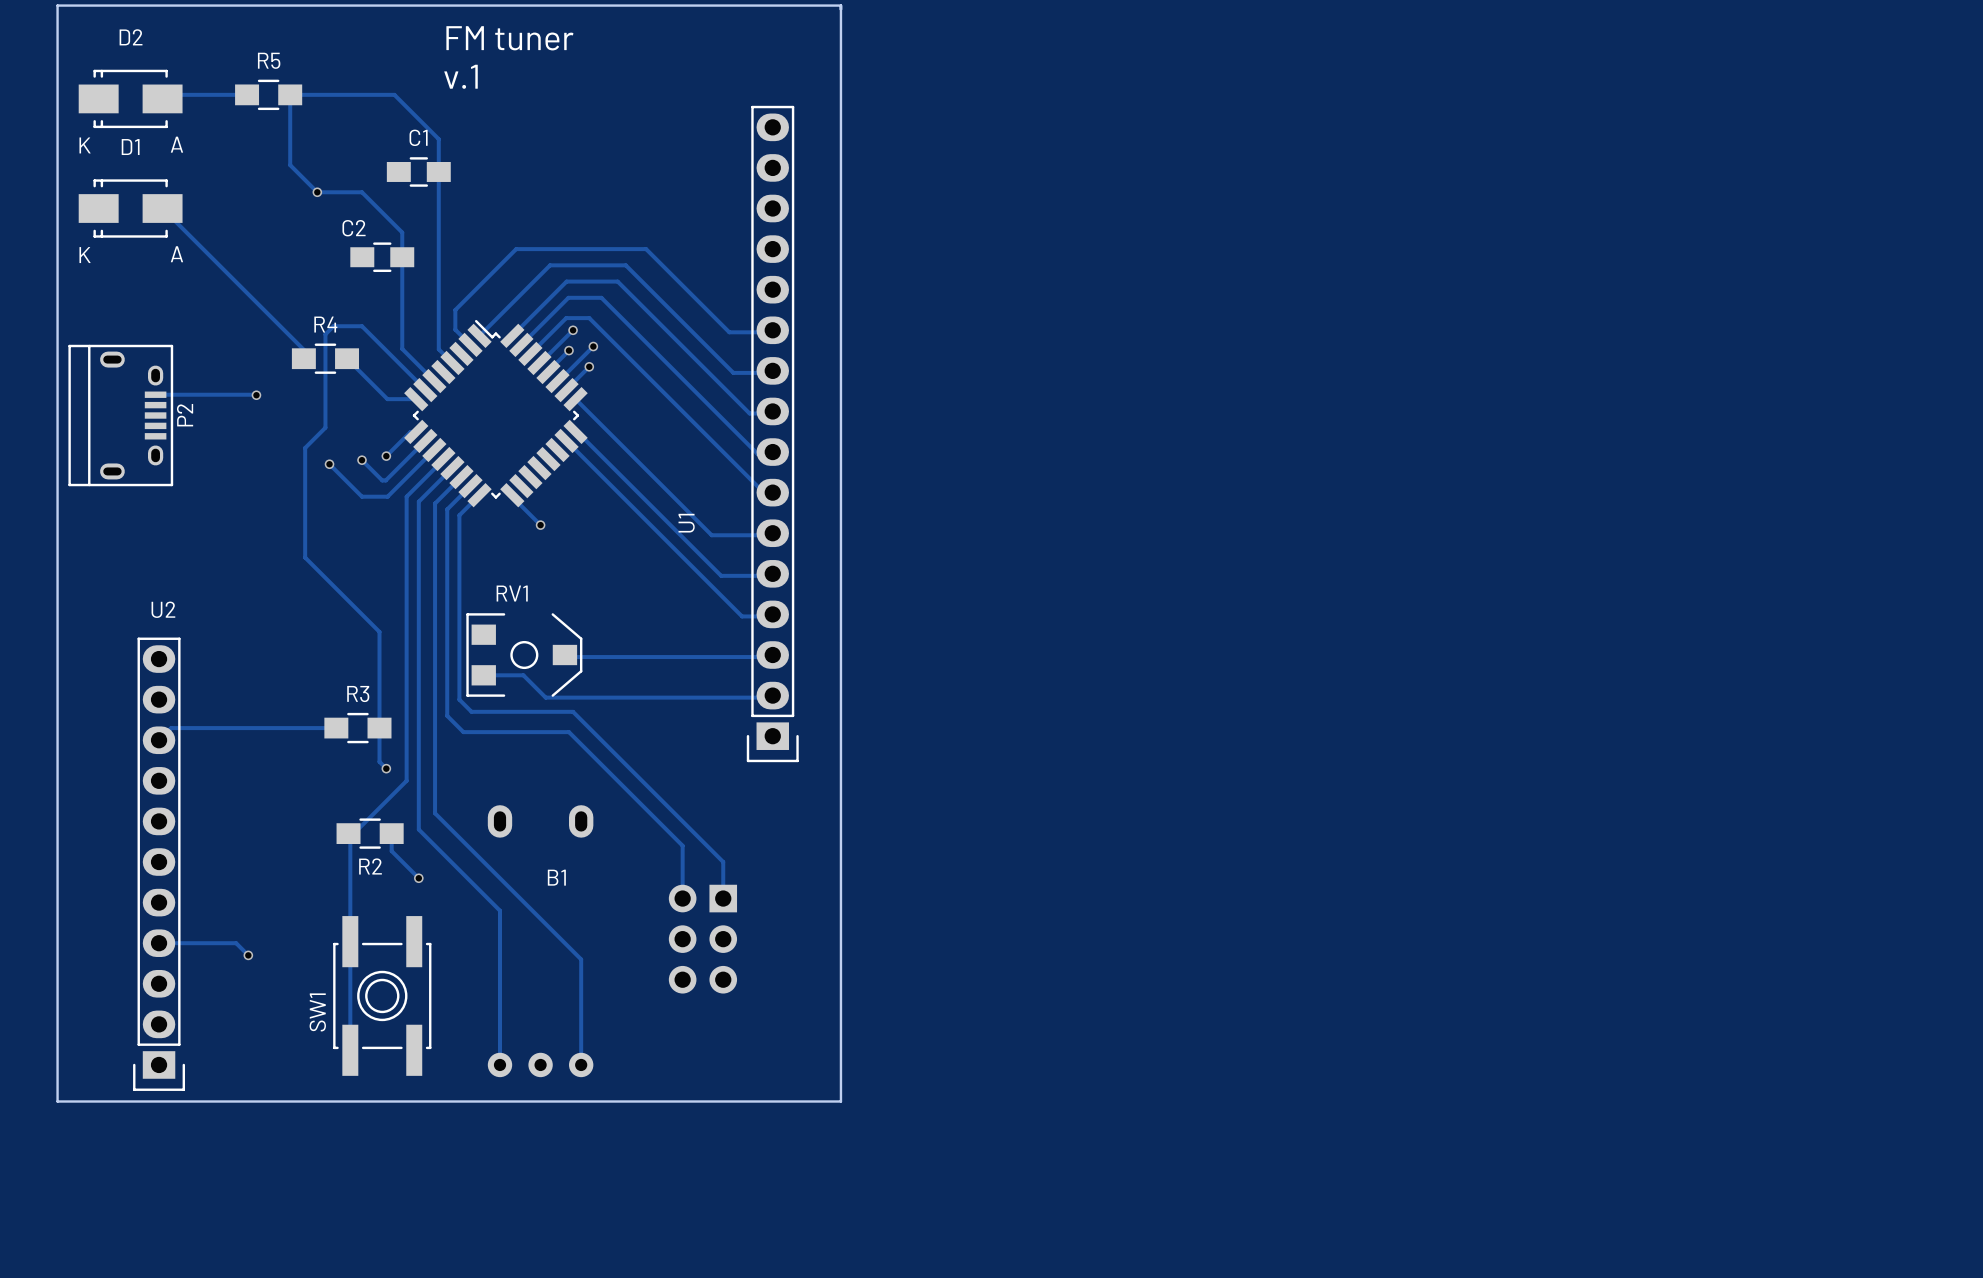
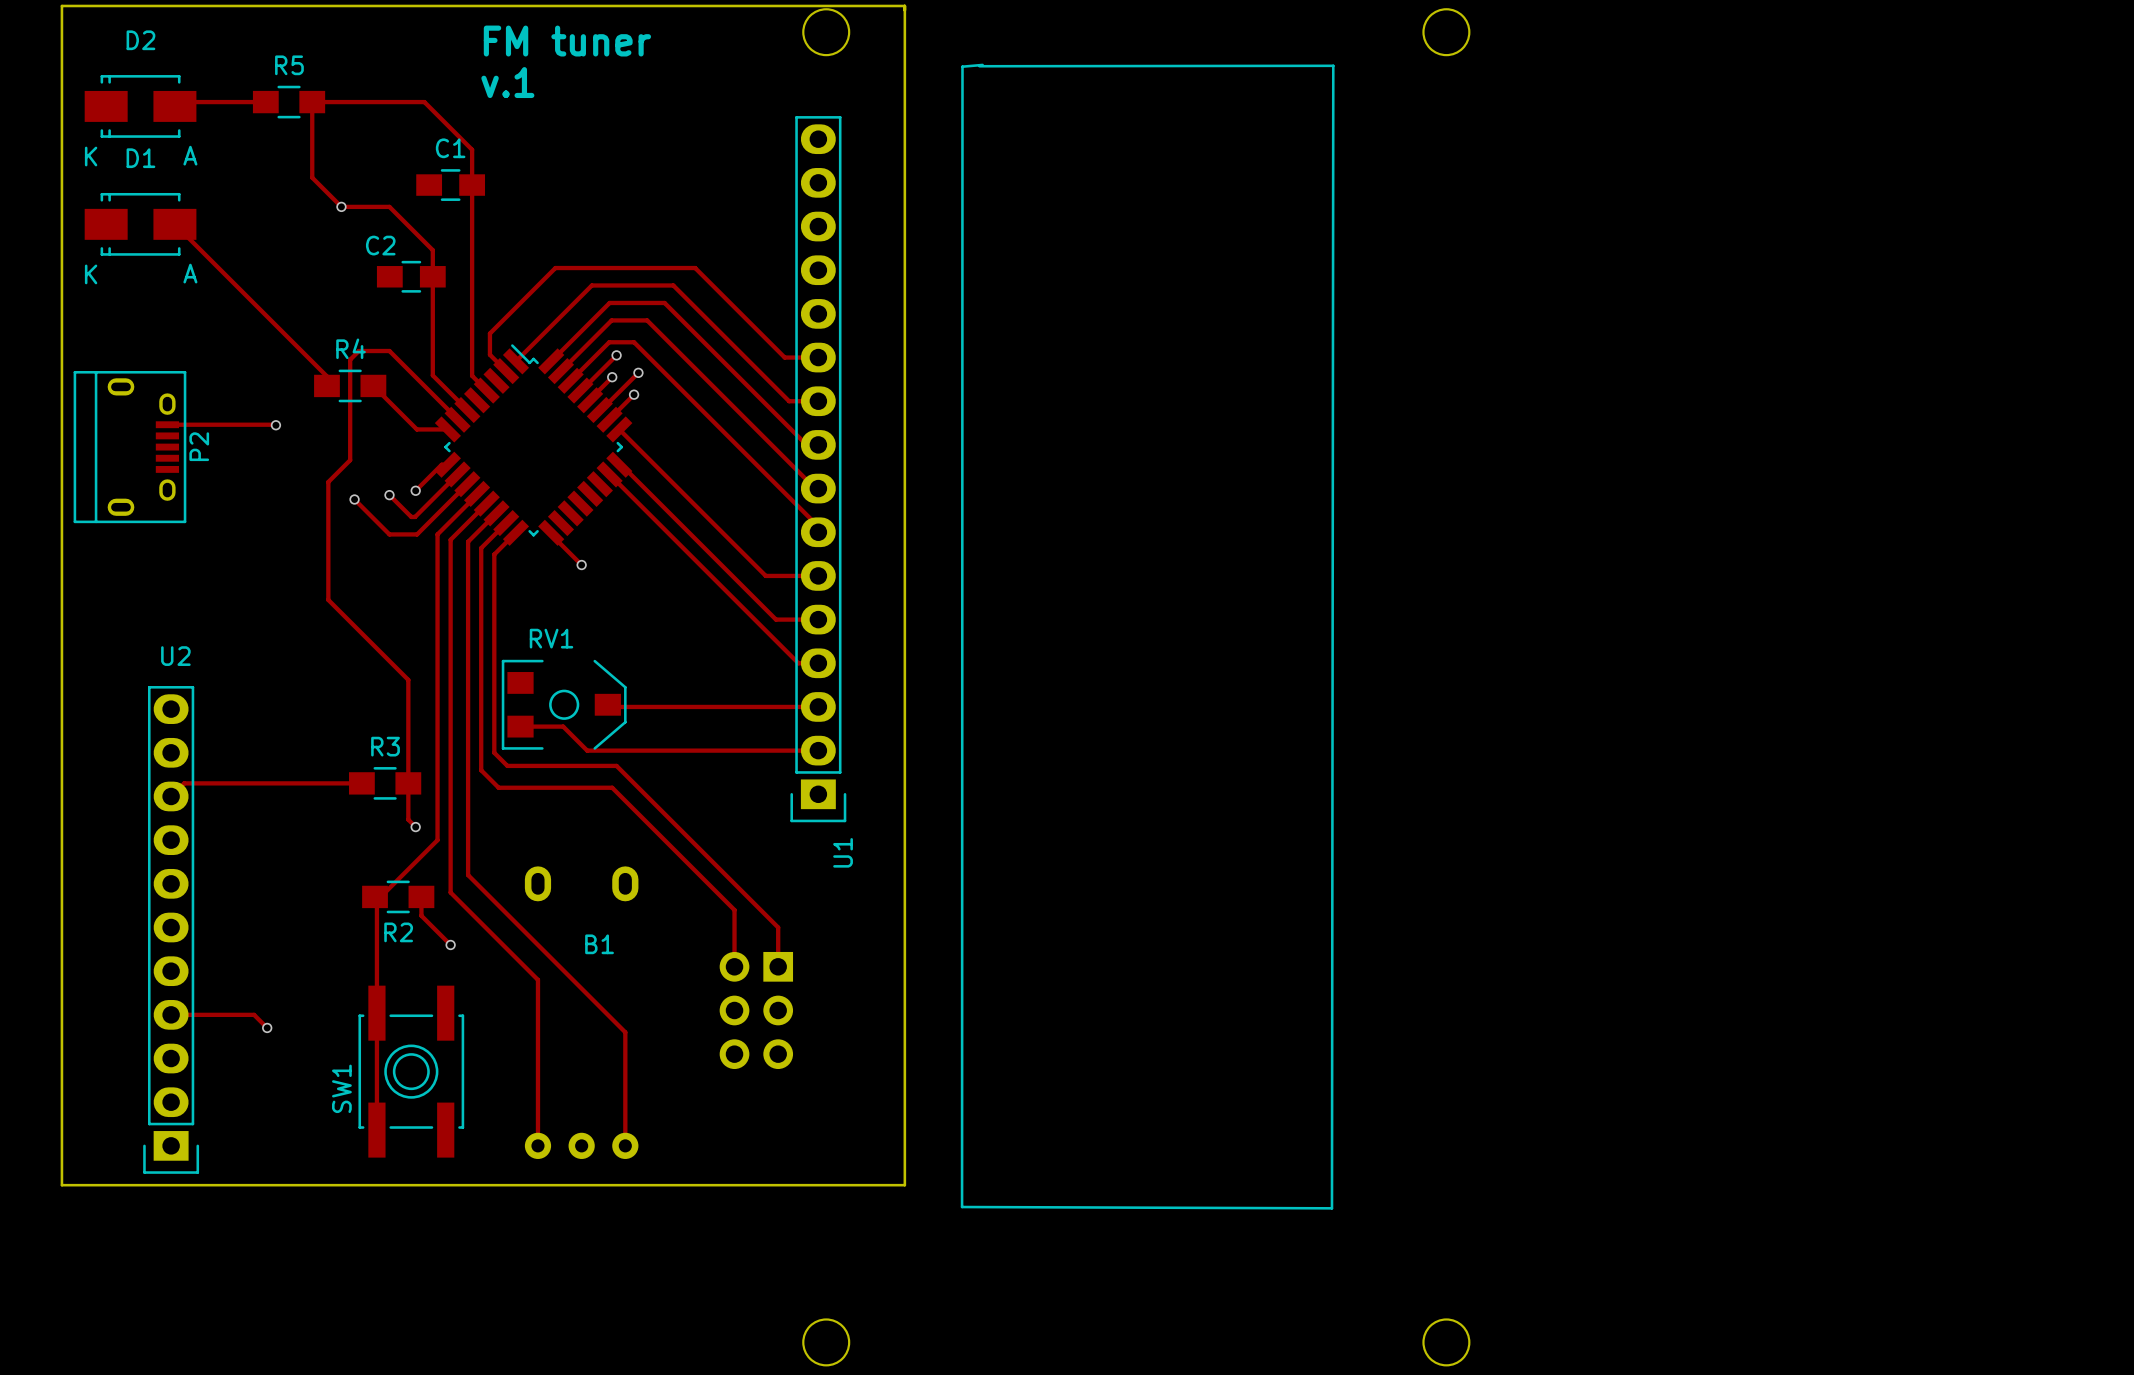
U1 footprint: [746, 105, 799, 763] -> [790, 8, 1471, 1367]
U1 name position: U1 (686, 523) -> U1 (843, 852)

